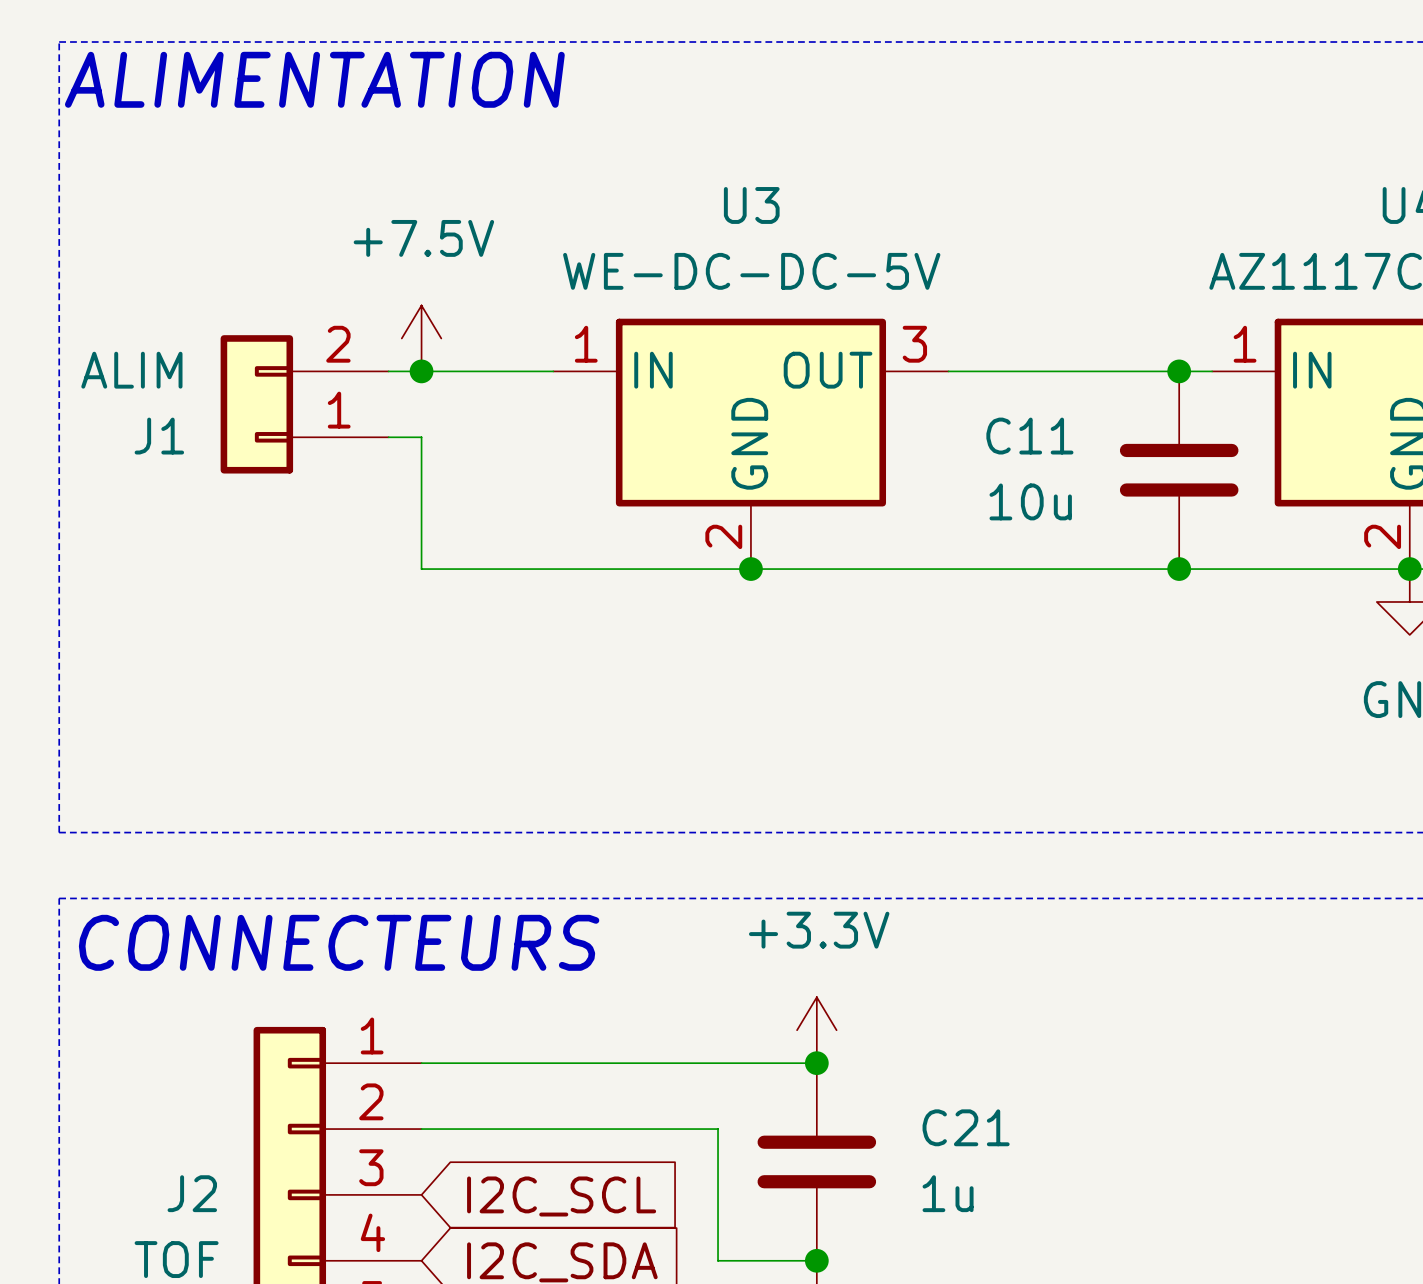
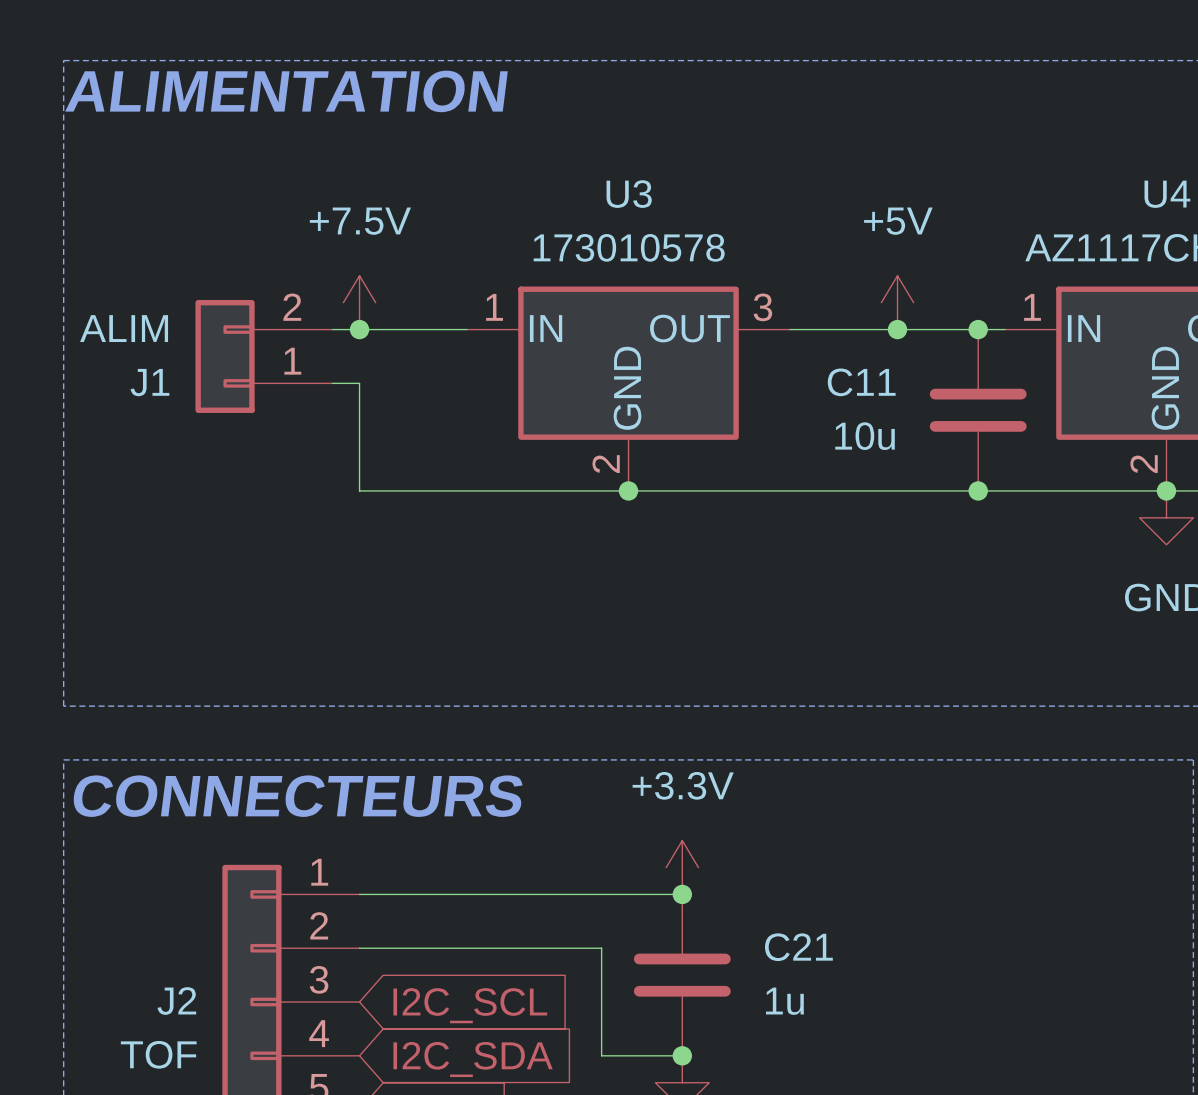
U3 value: WE-DC-DC-5V (751, 271) -> 173010578 (629, 247)
power symbol: none -> +5V (897, 302)
junction: none -> (897, 329)

